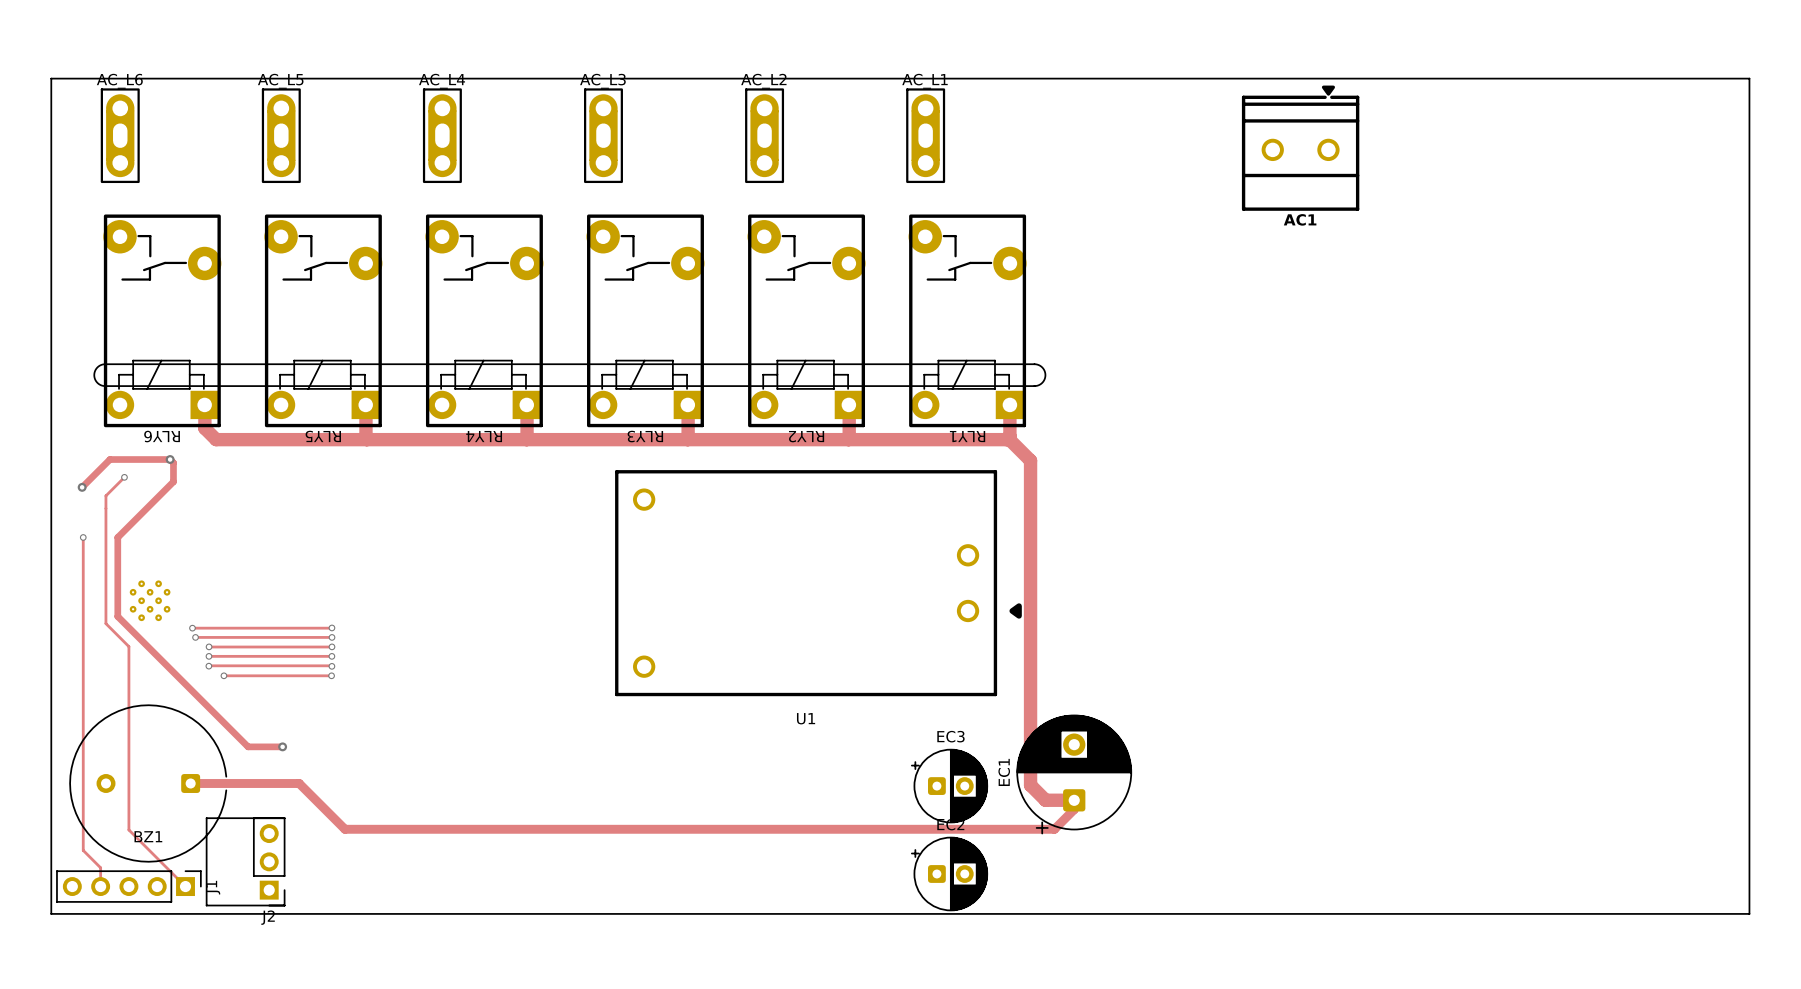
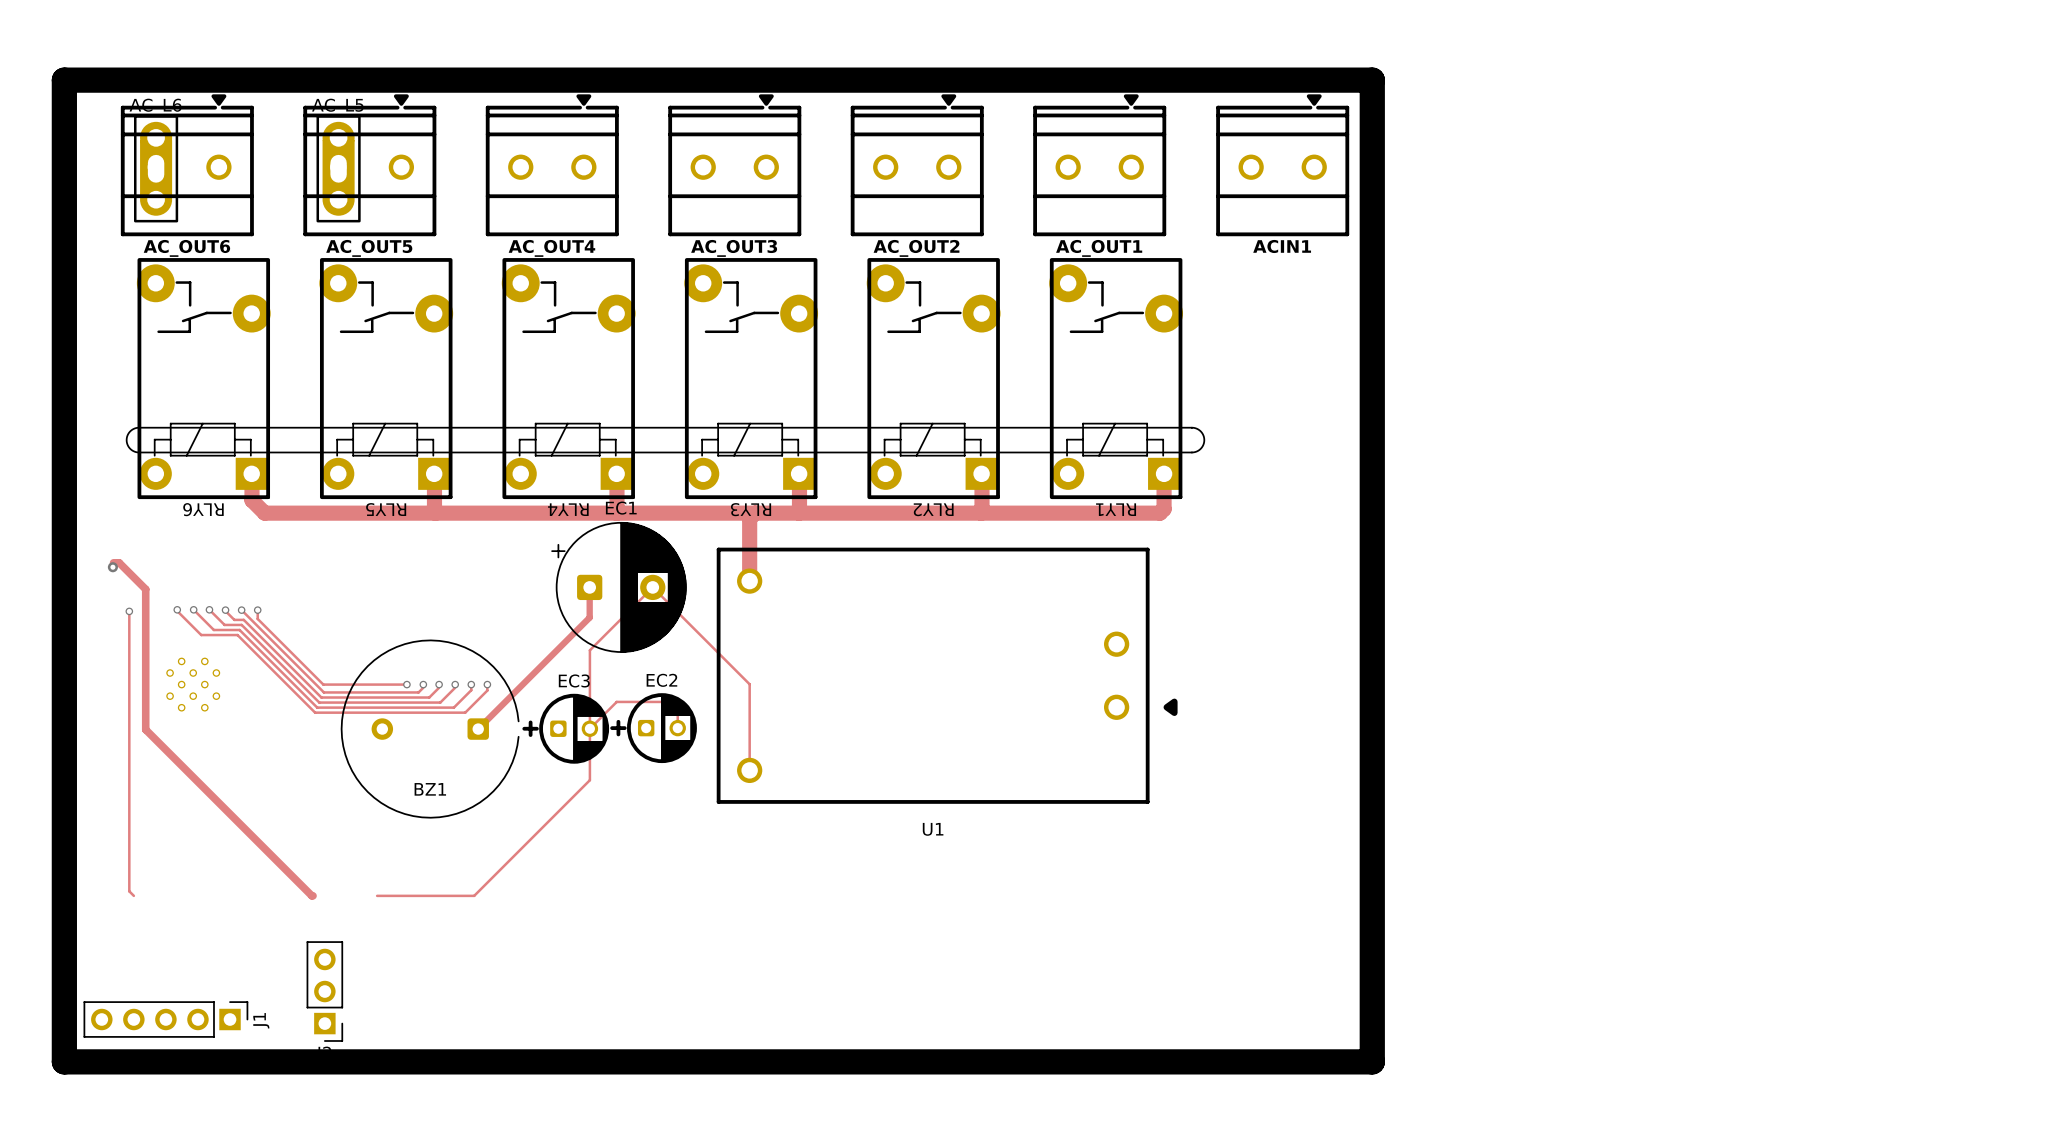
board edge: (51, 78) (1749, 78) (1749, 913) (51, 913) (51, 78) -> (64, 80) (64, 1061) (1372, 1061) (1372, 80) (64, 80)
AC_OUT6: none -> (187, 165)
AC_OUT5: none -> (369, 165)
AC_OUT4: none -> (552, 165)
AC_OUT3: none -> (734, 165)
AC_OUT2: none -> (917, 165)
AC_OUT1: none -> (1099, 165)
ACIN1: none -> (1282, 165)
AC_L4: (442, 135) -> none
AC_L3: (603, 135) -> none
AC_L2: (764, 135) -> none
AC_L1: (925, 135) -> none
AC1: (1300, 148) -> none
track: none -> (755, 513) (749, 518) (749, 581)
track: (1006, 439) (1009, 439) (1030, 460) (1030, 785) (1045, 800) (1073, 800) -> none
via: (170, 459) -> none
track: (124, 477) (105, 495) (105, 623) (128, 646) (128, 829) (185, 886) -> none
via: (124, 477) -> none
track: none -> (113, 562) (119, 562) (145, 589) (145, 729) (313, 895)
track: (82, 487) (109, 459) (170, 459) (173, 462) (173, 481) (117, 537) (117, 616) (248, 746) (282, 746) -> none
track: none -> (589, 587) (589, 617) (478, 729)
track: none -> (177, 609) (201, 635) (237, 635) (315, 712) (465, 712) (487, 690) (487, 687)
via: none -> (177, 609)
track: none -> (193, 609) (213, 630) (239, 630) (317, 707) (453, 707) (471, 690) (471, 687)
via: none -> (193, 609)
track: none -> (209, 609) (224, 624) (241, 624) (319, 702) (440, 702) (455, 687)
via: none -> (209, 609)
track: none -> (225, 610) (234, 619) (243, 619) (321, 697) (429, 697) (439, 687)
via: none -> (225, 610)
track: none -> (241, 610) (323, 692) (418, 692) (423, 687)
via: none -> (241, 610)
track: none -> (257, 610) (257, 618) (323, 684) (406, 684)
via: none -> (257, 610)
track: none -> (129, 611) (129, 891) (133, 895)
track: (83, 537) (83, 850) (100, 867) (100, 886) -> none
via position: (83, 537) -> (129, 611)
part footprint: [129, 580, 171, 622] -> [166, 657, 221, 712]
via: none -> (406, 684)
via: none -> (423, 684)
via: none -> (439, 684)
via: none -> (455, 684)
via: none -> (471, 684)
via: none -> (487, 684)
track: (331, 627) (192, 628) -> none
via: (331, 627) -> none
via: (192, 628) -> none
track: none -> (677, 728) (677, 711) (668, 701) (616, 701) (589, 728)
track: (195, 637) (332, 637) -> none
via: (195, 637) -> none
via: (332, 637) -> none
via: (209, 646) -> none
via: (331, 646) -> none
track: (209, 647) (331, 647) -> none
track: (208, 656) (331, 656) -> none
via: (208, 656) -> none
via: (331, 656) -> none
track: (208, 666) (331, 666) -> none
via: (208, 666) -> none
via: (331, 666) -> none
track: none -> (749, 770) (749, 684) (652, 587) (589, 650) (589, 780) (474, 895) (377, 895)
track: (223, 675) (331, 675) -> none
via: (223, 675) -> none
via: (331, 675) -> none
via: (282, 746) -> none
EC3 footprint: [911, 748, 988, 824] -> [522, 693, 610, 764]
EC1 rotation: 0° (1074, 774) -> 90° clockwise (618, 587)
EC1 position: (1074, 774) -> (618, 587)
BZ1 position: (148, 783) -> (430, 729)
track: (190, 783) (299, 783) (344, 829) (1054, 829) (1074, 809) (1074, 800) -> none
line: (284, 818) (206, 818) (206, 905) (284, 905) -> none
EC2 footprint: [911, 836, 988, 912] -> [610, 693, 697, 764]

